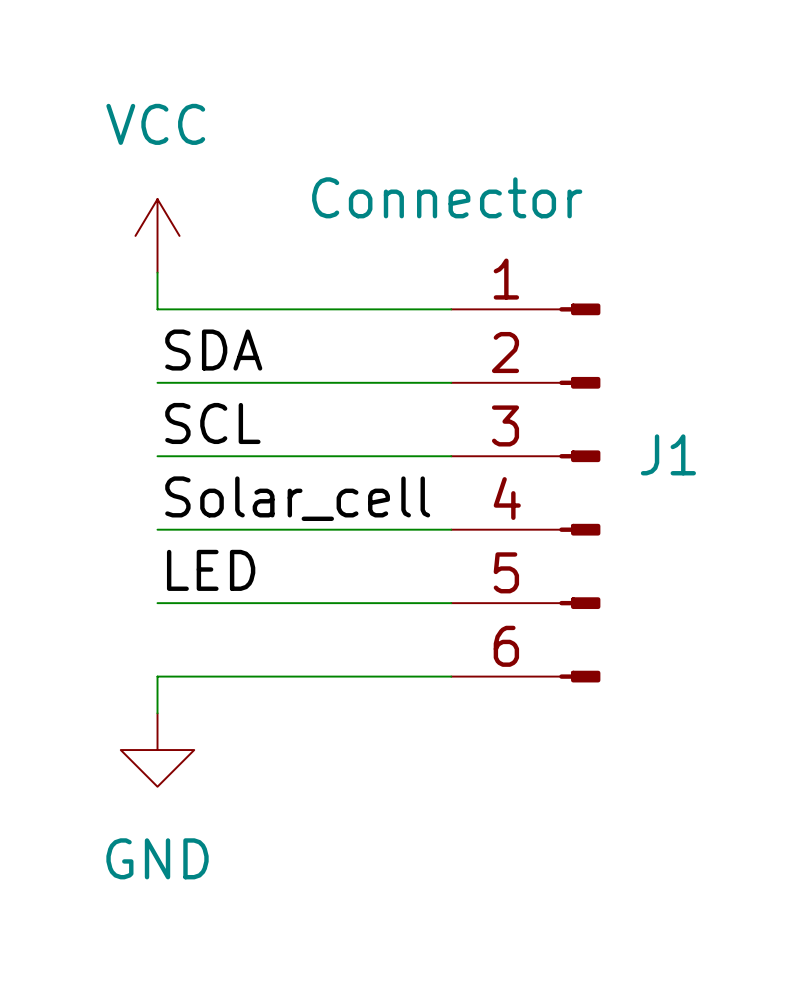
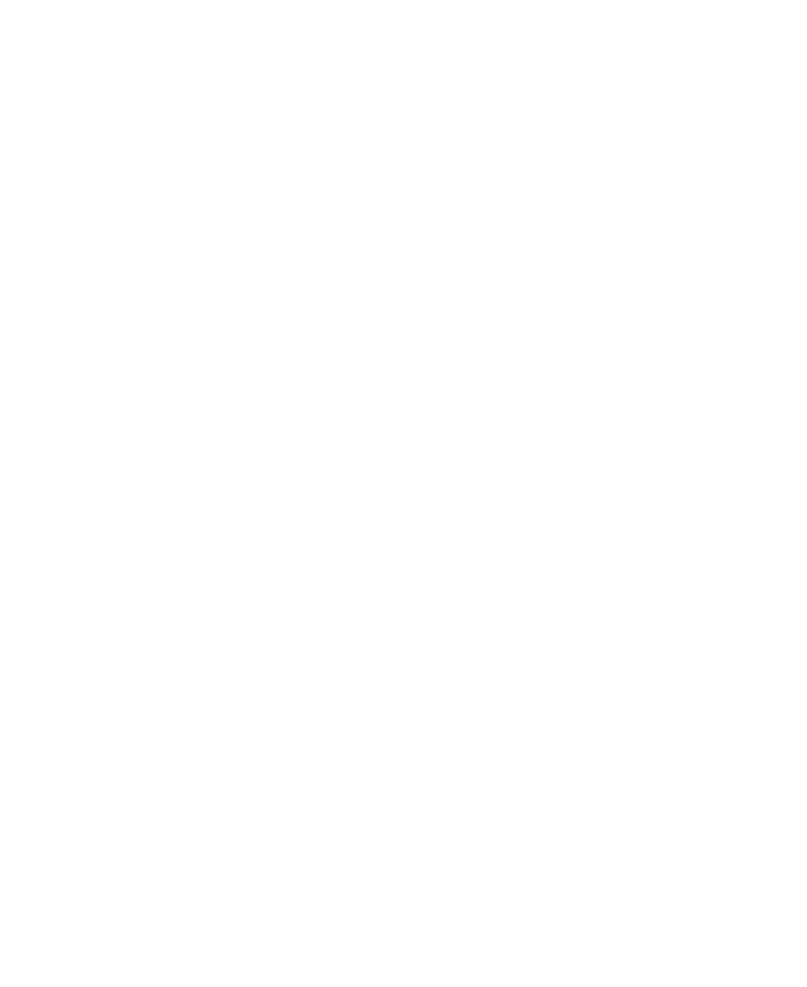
power symbol: VCC (157, 235) -> none
wire: (157, 272) (157, 309) (451, 309) -> none
label: SDA (213, 350) -> none
wire: (157, 382) (451, 382) -> none
label: SCL (212, 423) -> none
wire: (157, 456) (451, 456) -> none
J1: Connector (525, 492) -> none
label: Solar_cell (297, 498) -> none
wire: (157, 529) (451, 529) -> none
label: LED (211, 570) -> none
wire: (157, 603) (451, 603) -> none
wire: (451, 676) (157, 676) (157, 713) -> none
power symbol: GND (157, 750) -> none

